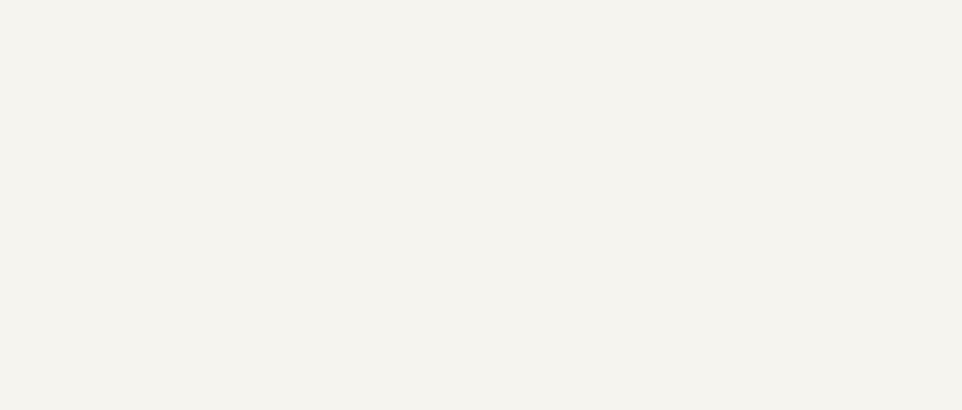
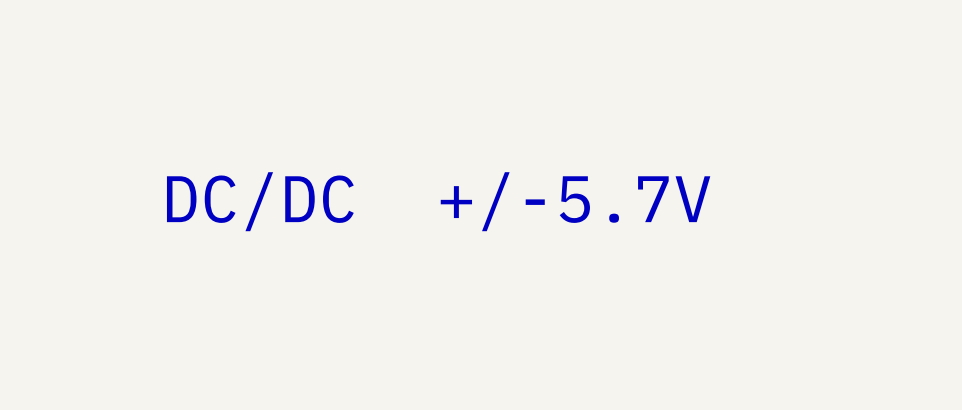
text: none -> DC/DC +/-5.7V (438, 201)

